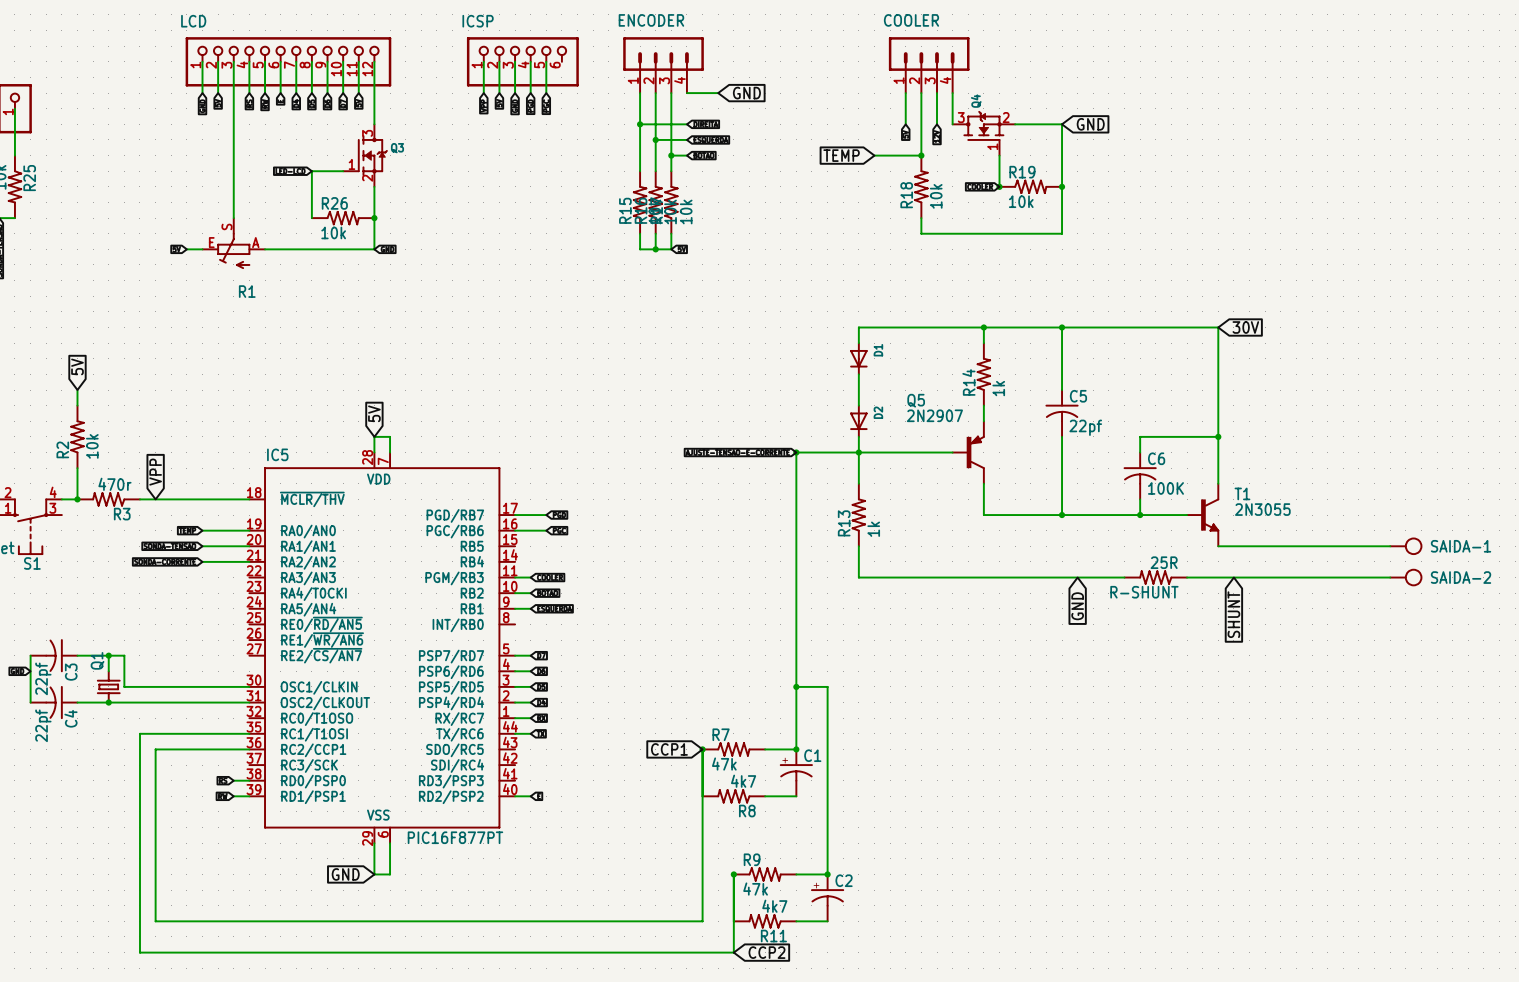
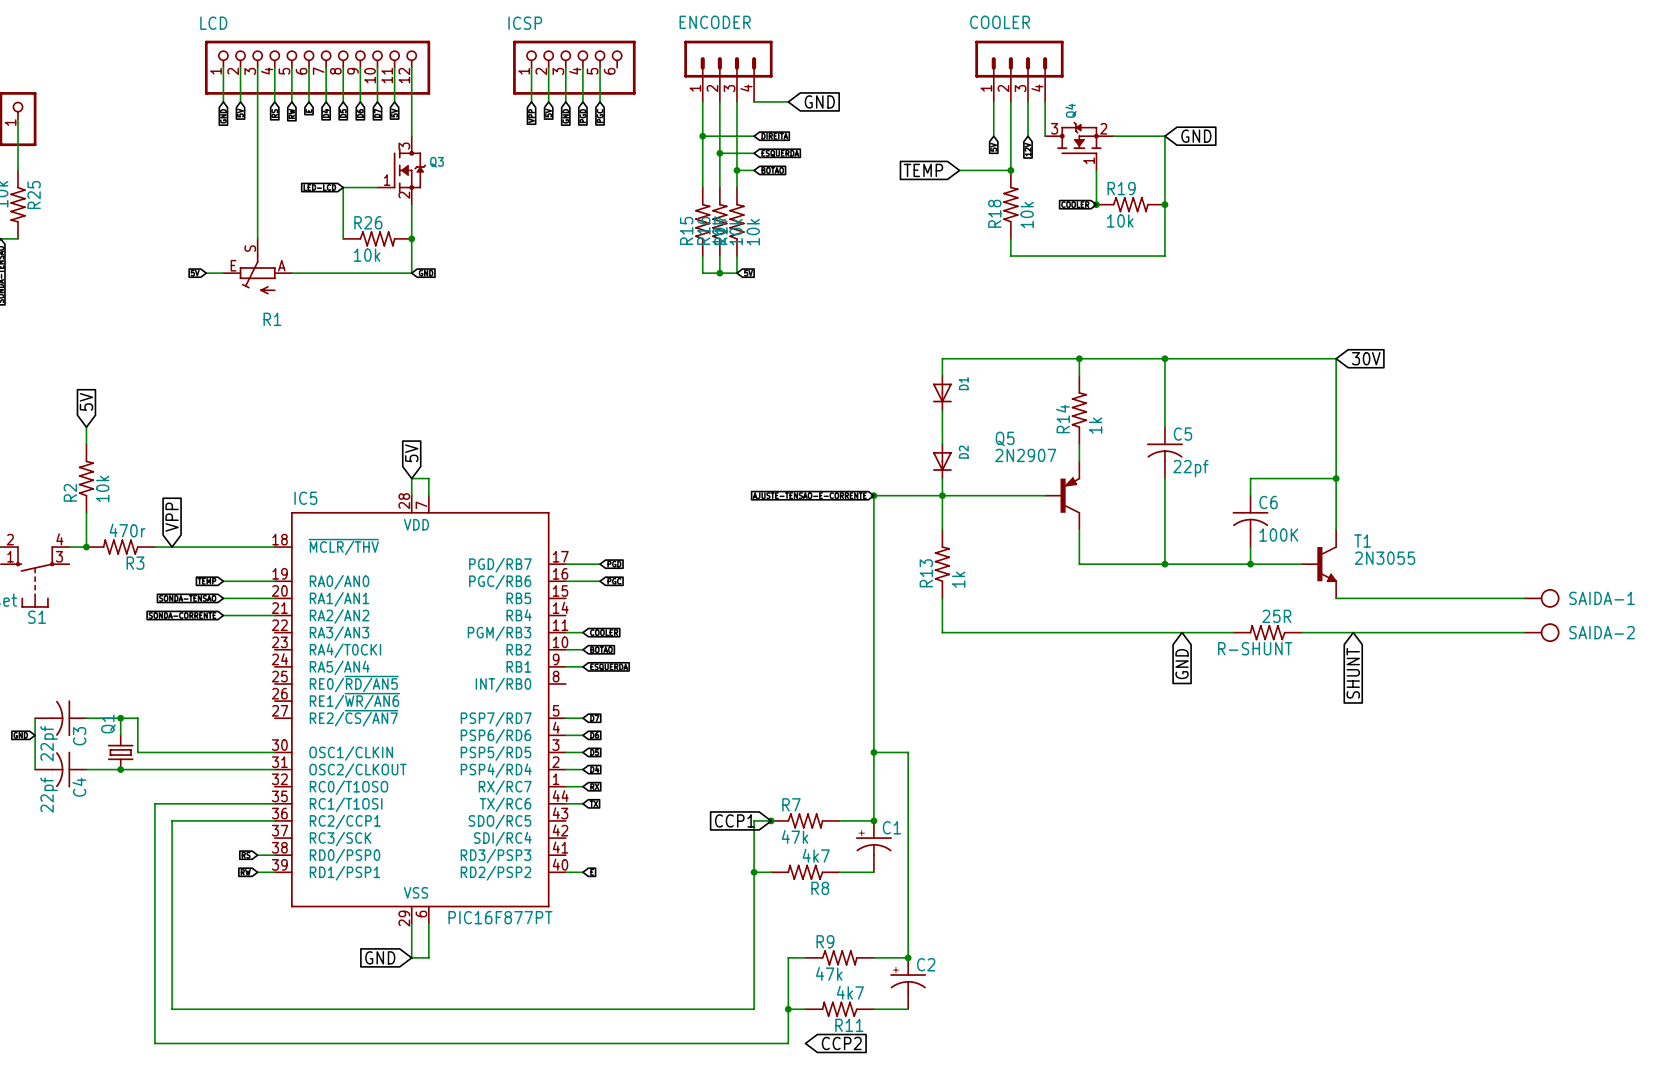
wire: (702, 749) (702, 921) (686, 921) -> (771, 820) (754, 820) (754, 1009)
wire: none -> (754, 872) (771, 872)
junction: none -> (754, 872)
wire: (733, 874) (733, 952) (718, 952) -> (805, 957) (788, 957) (788, 1043)
junction: (733, 874) -> none
wire: none -> (788, 1009) (805, 1009)
junction: none -> (788, 1009)

